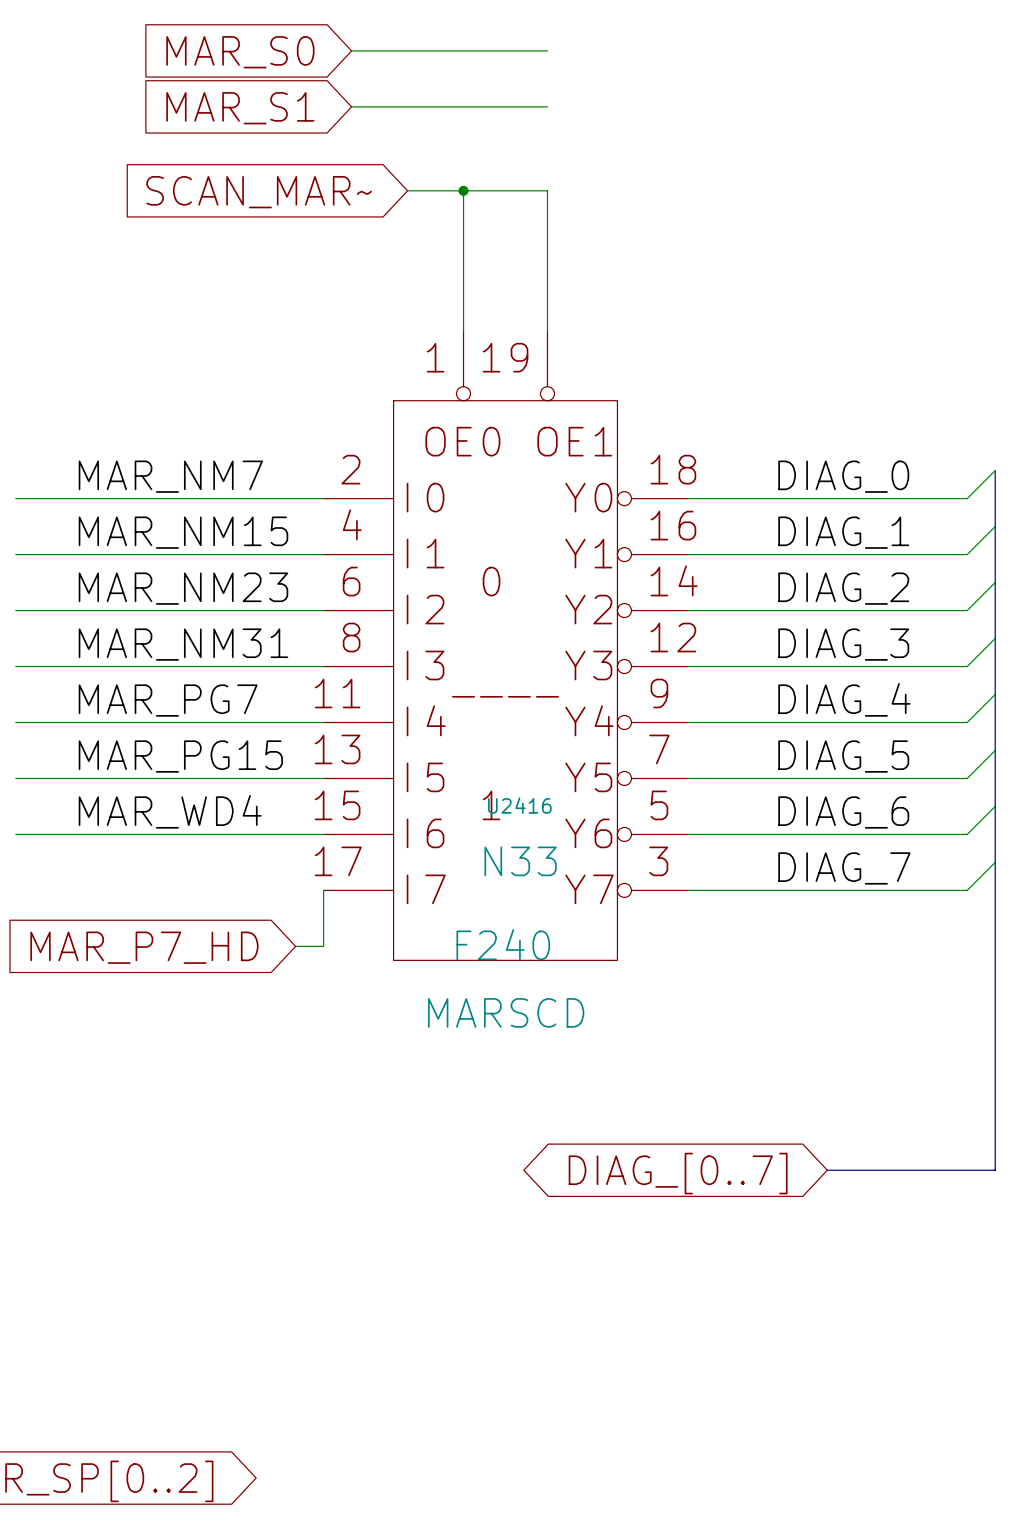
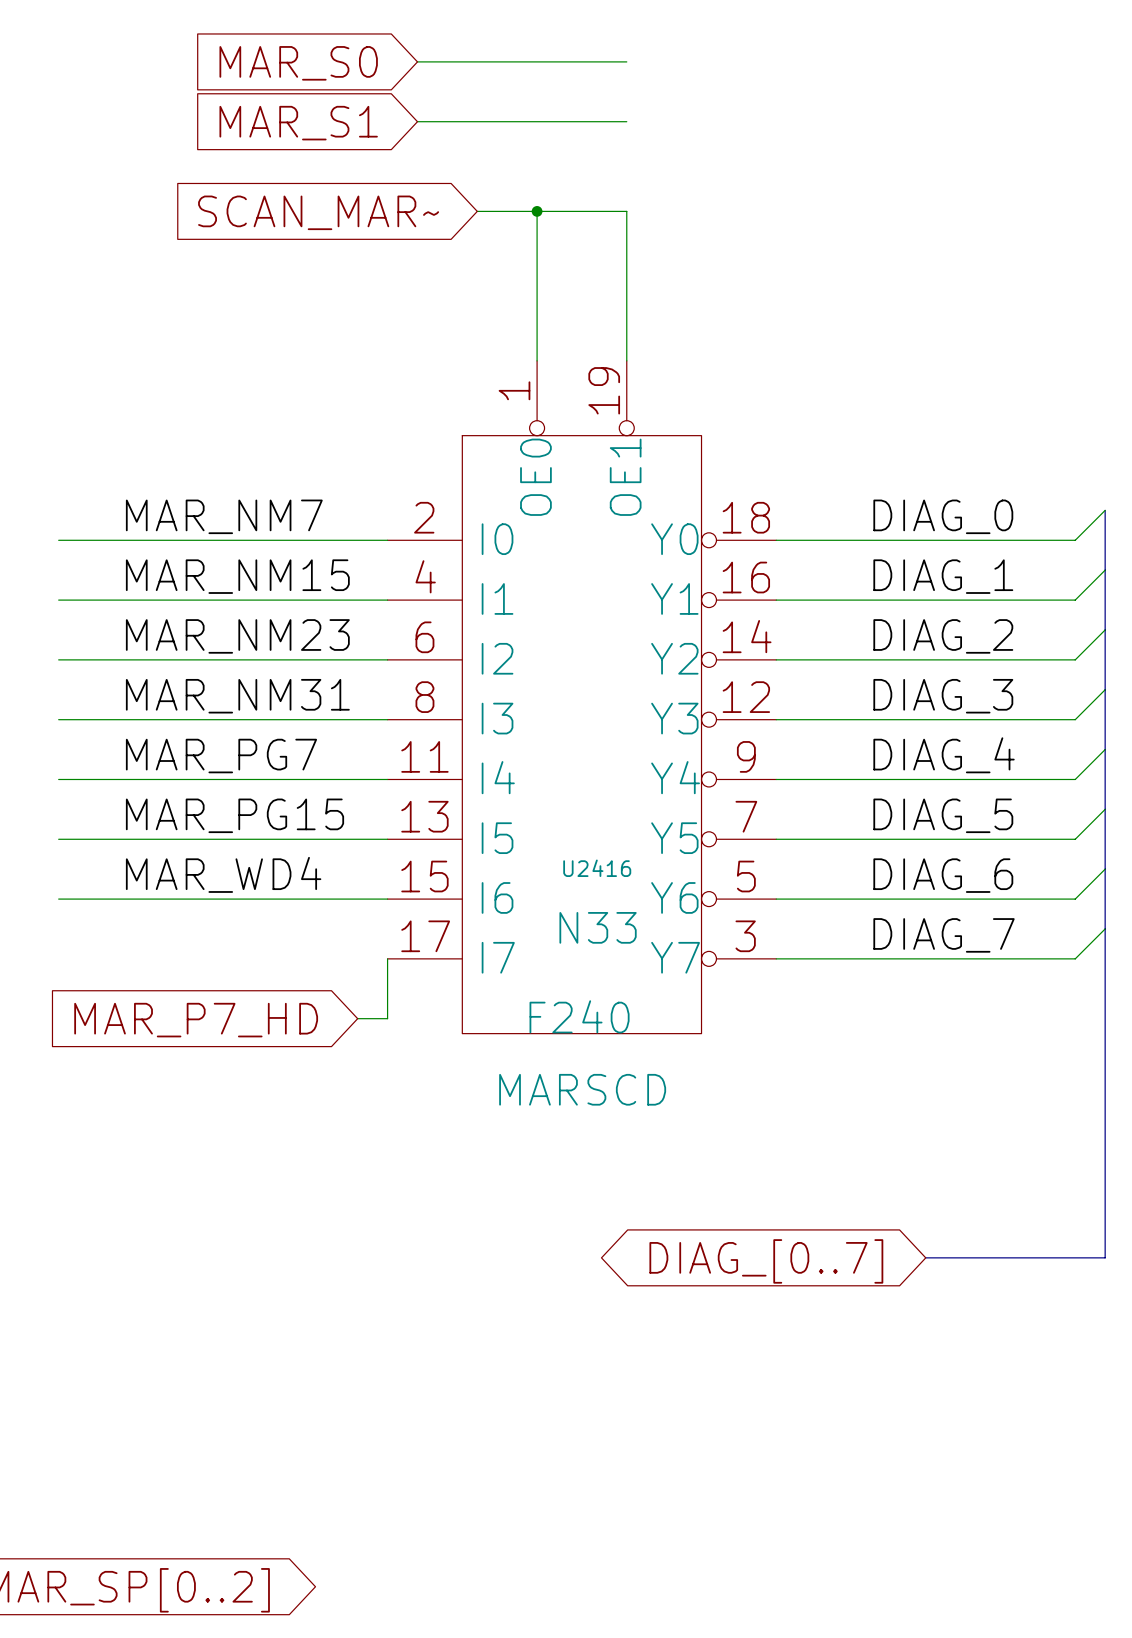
U2416 symbol: [323, 330, 688, 961] -> [387, 360, 777, 1034]

